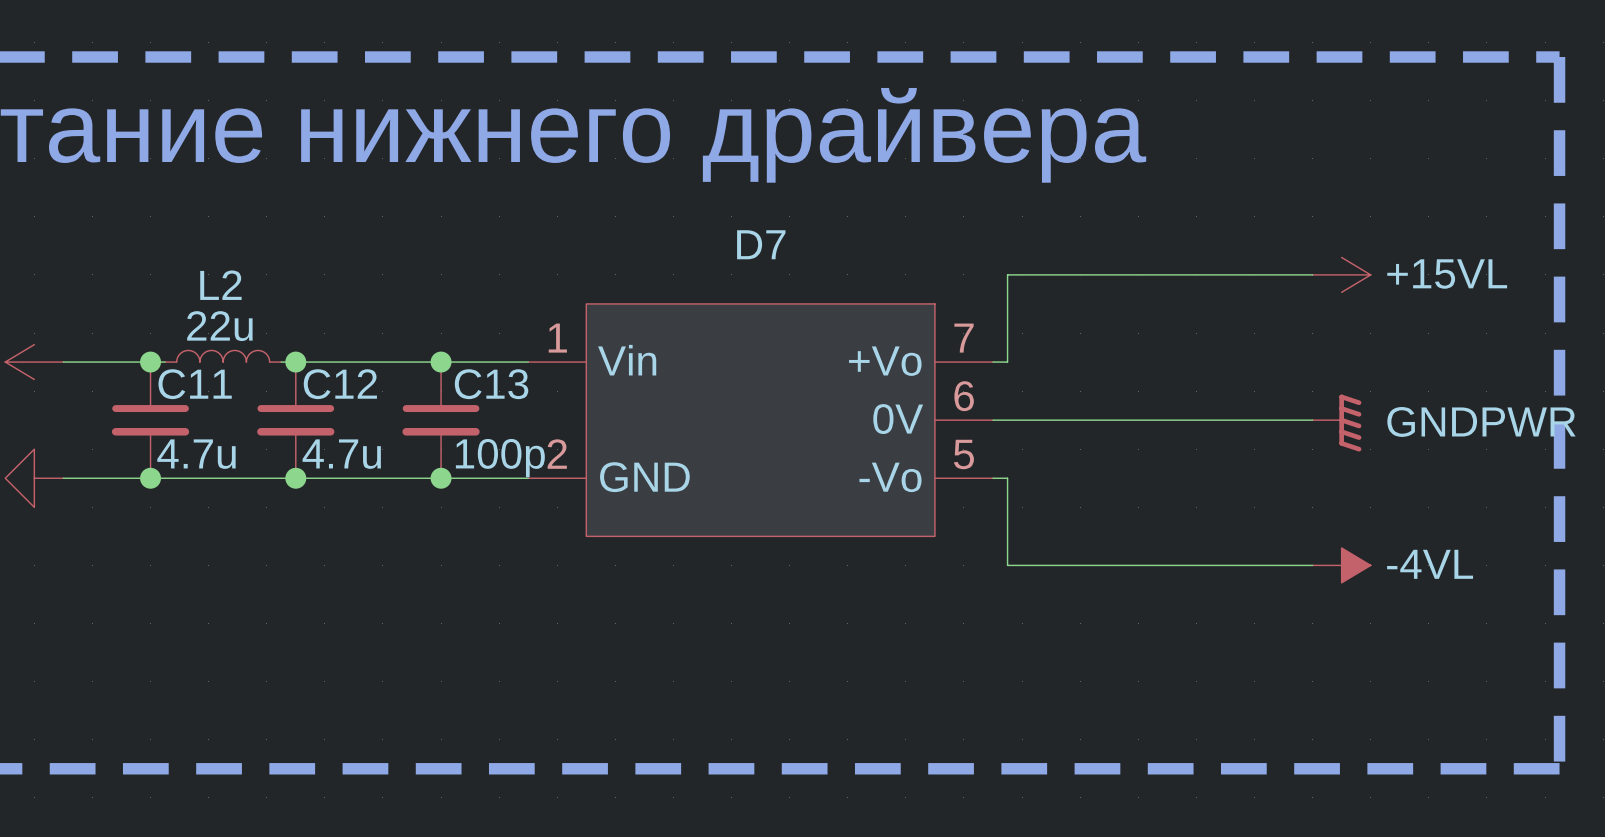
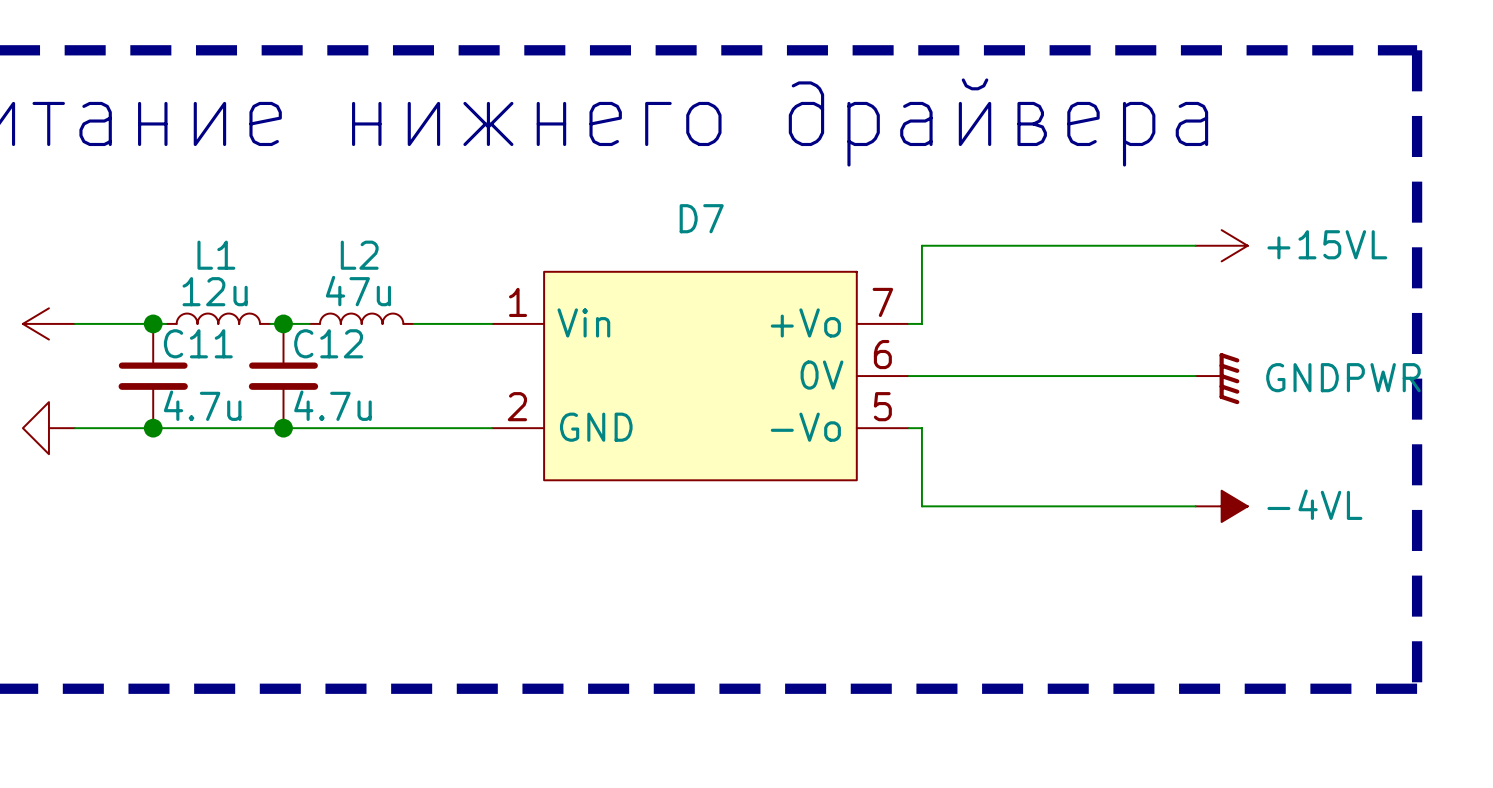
L2 name: L2 (220, 285) -> L1 (216, 255)
L2 value: 22u (219, 326) -> 12u (215, 291)
L2: none -> 47u (361, 318)
wire: (324, 362) (441, 362) -> none
junction: (441, 362) -> none
C13: 100p (441, 420) -> none
junction: (441, 478) -> none

